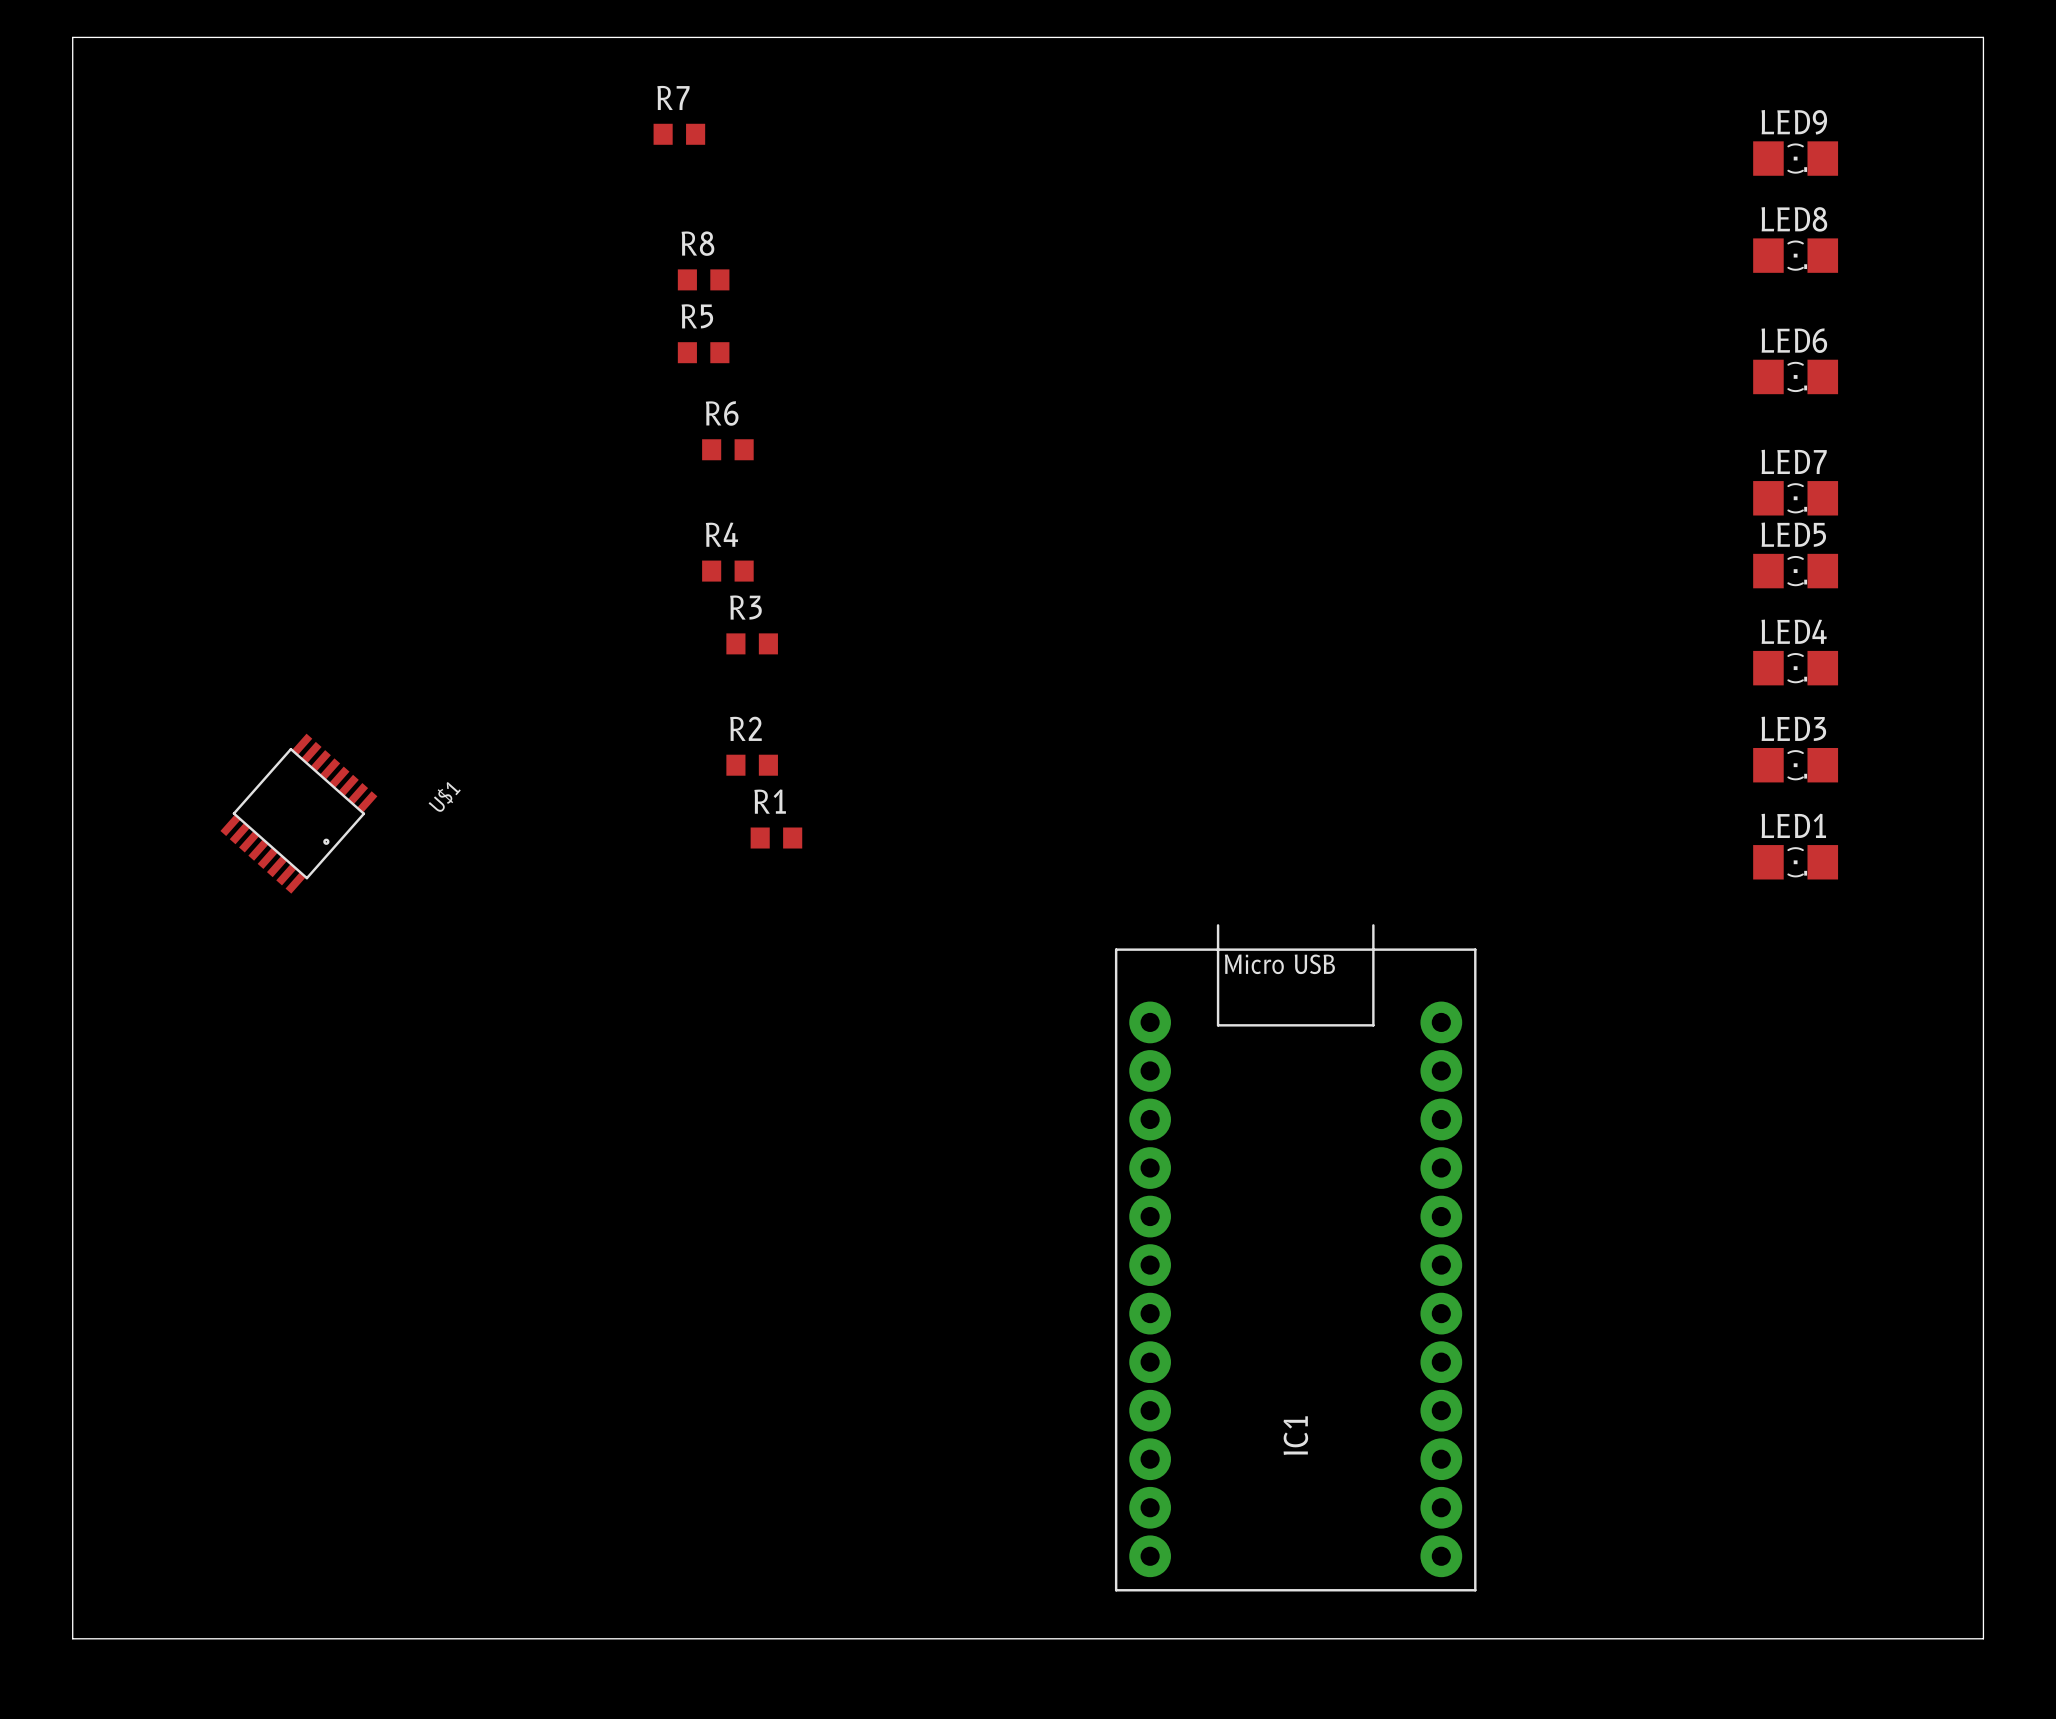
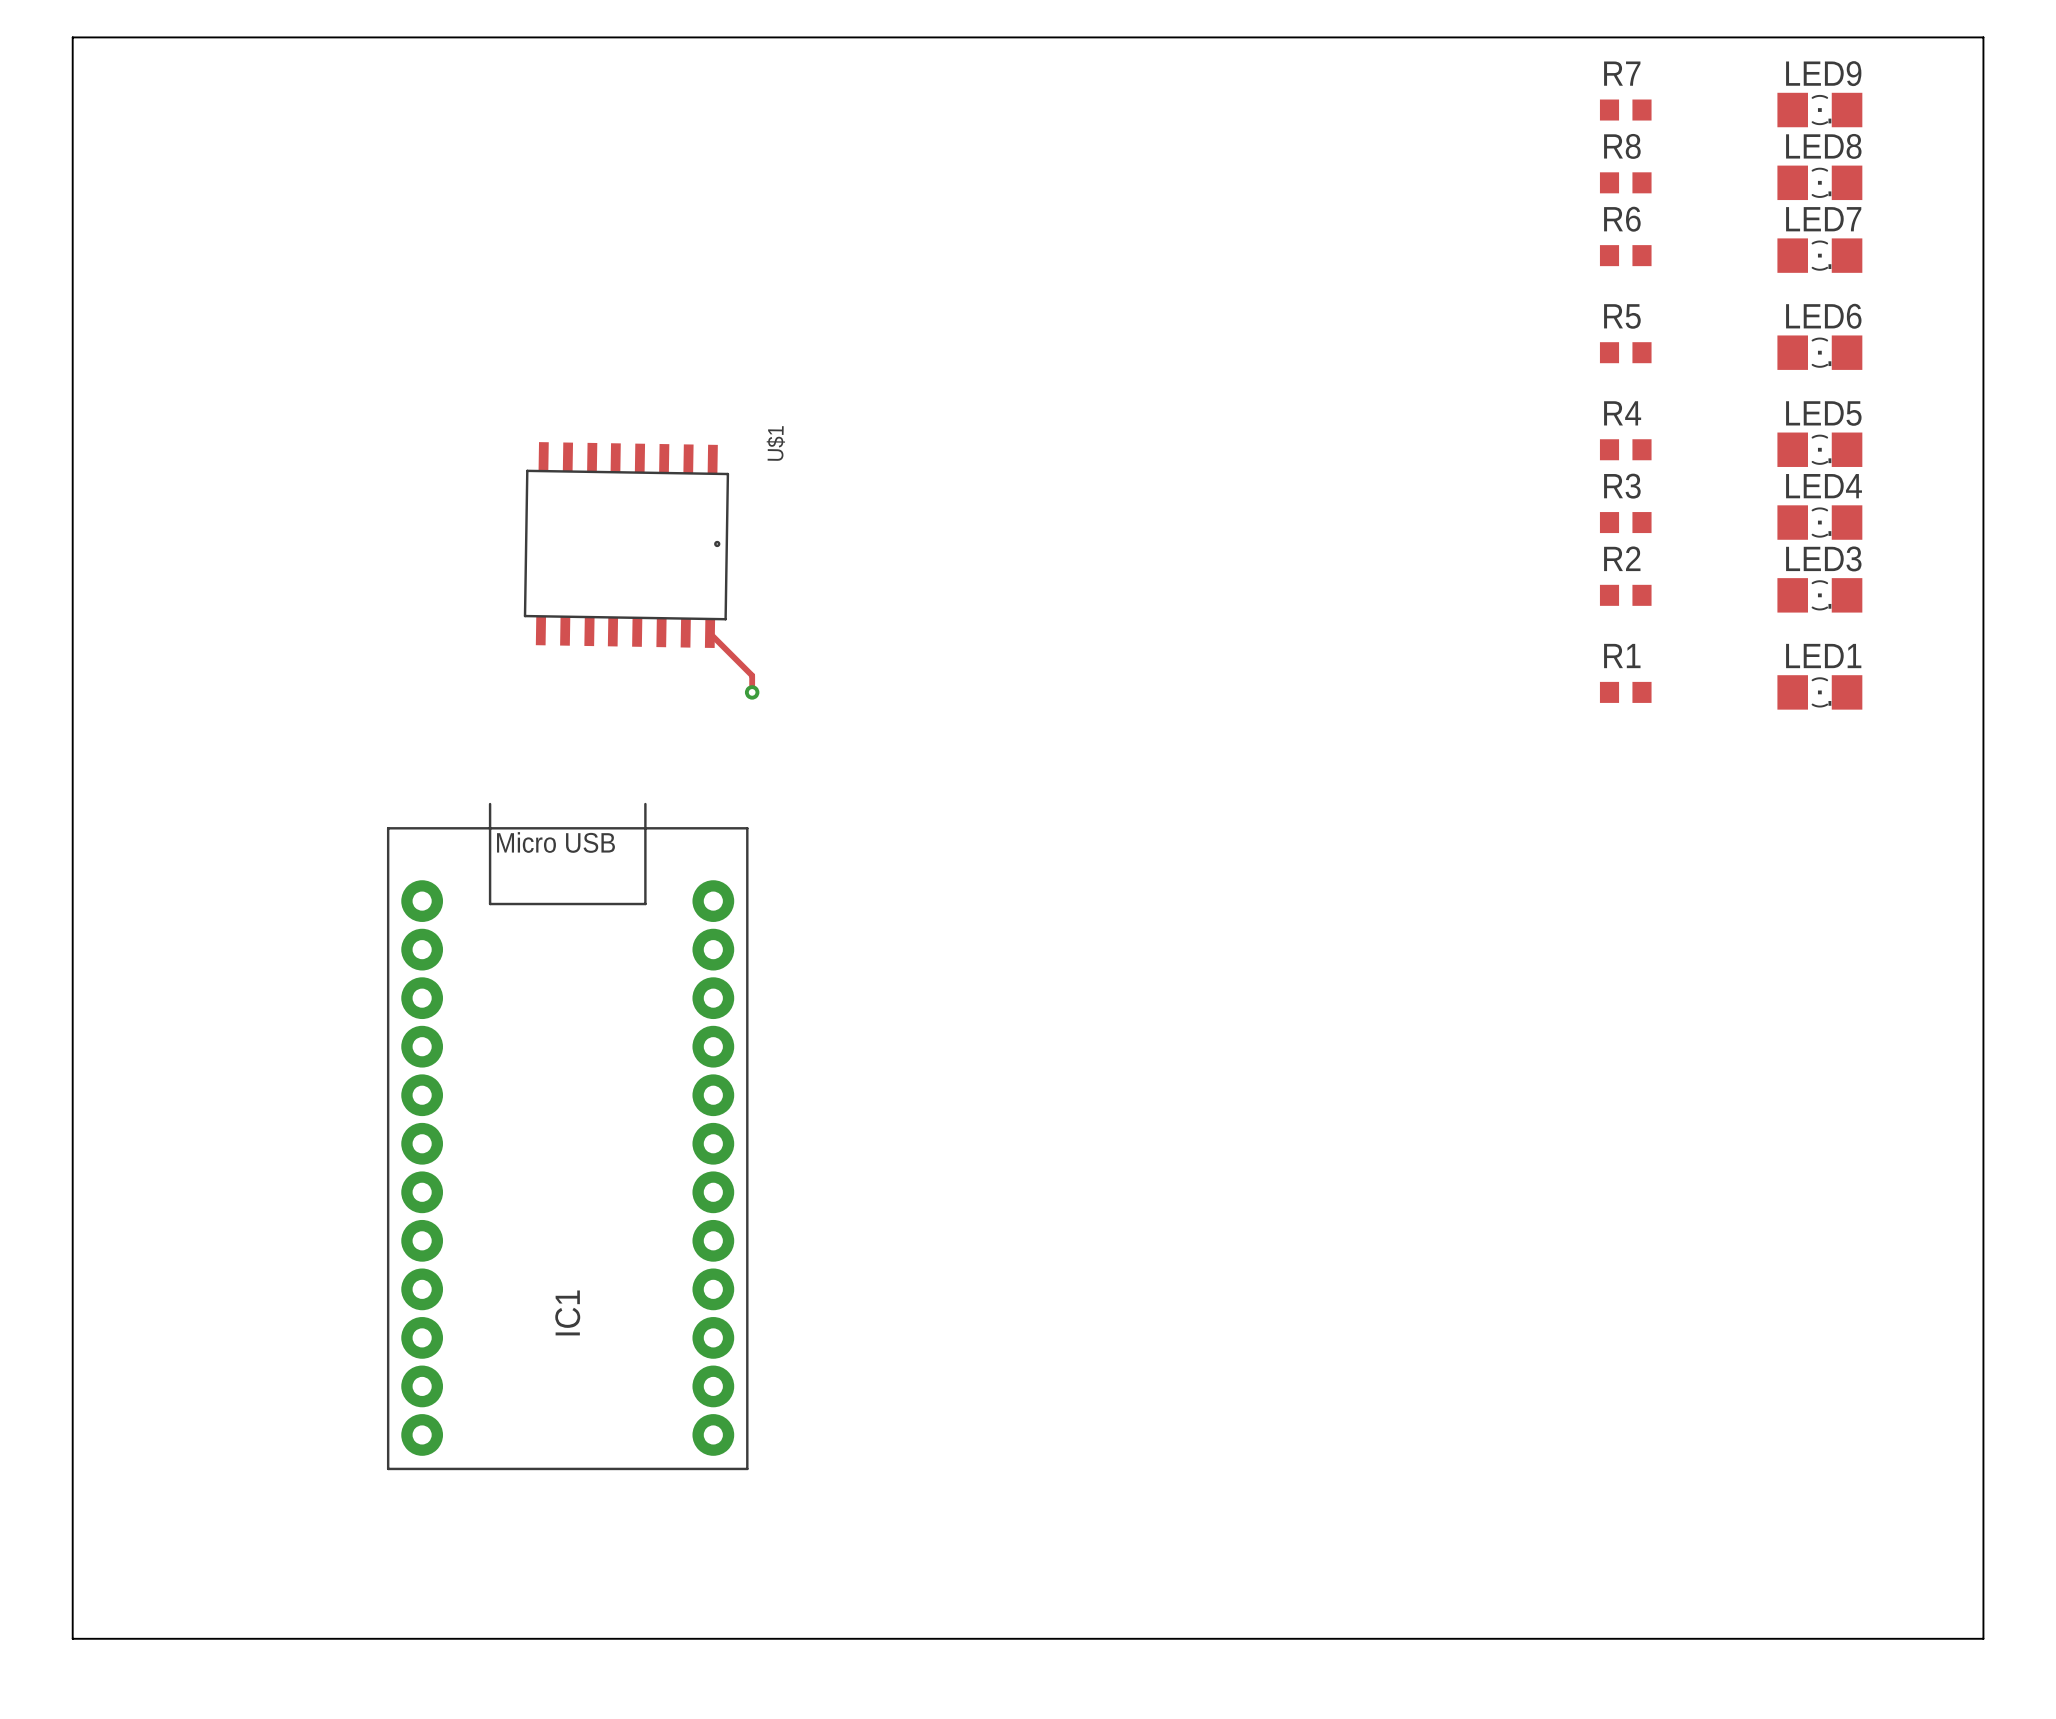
R7 position: (679, 134) -> (1625, 110)
LED9 position: (1795, 158) -> (1819, 110)
LED8 position: (1795, 255) -> (1819, 182)
R8 position: (703, 279) -> (1625, 182)
R5 position: (703, 352) -> (1625, 352)
LED6 position: (1795, 376) -> (1819, 352)
R6 position: (727, 449) -> (1625, 255)
LED7 position: (1795, 498) -> (1819, 255)
R4 position: (727, 571) -> (1625, 449)
LED5 position: (1795, 571) -> (1819, 449)
track: none -> (710, 633) (752, 675) (752, 692)
R3 position: (752, 643) -> (1625, 522)
LED4 position: (1795, 668) -> (1819, 522)
via: none -> (752, 692)
U$1 footprint: [220, 733, 378, 894] -> [523, 442, 730, 648]
R2 position: (752, 765) -> (1625, 595)
LED3 position: (1795, 765) -> (1819, 595)
U$1 name position: U$1 (444, 796) -> U$1 (775, 443)
R1 position: (776, 838) -> (1625, 692)
LED1 position: (1795, 862) -> (1819, 692)
IC1 position: (1295, 1257) -> (567, 1136)

